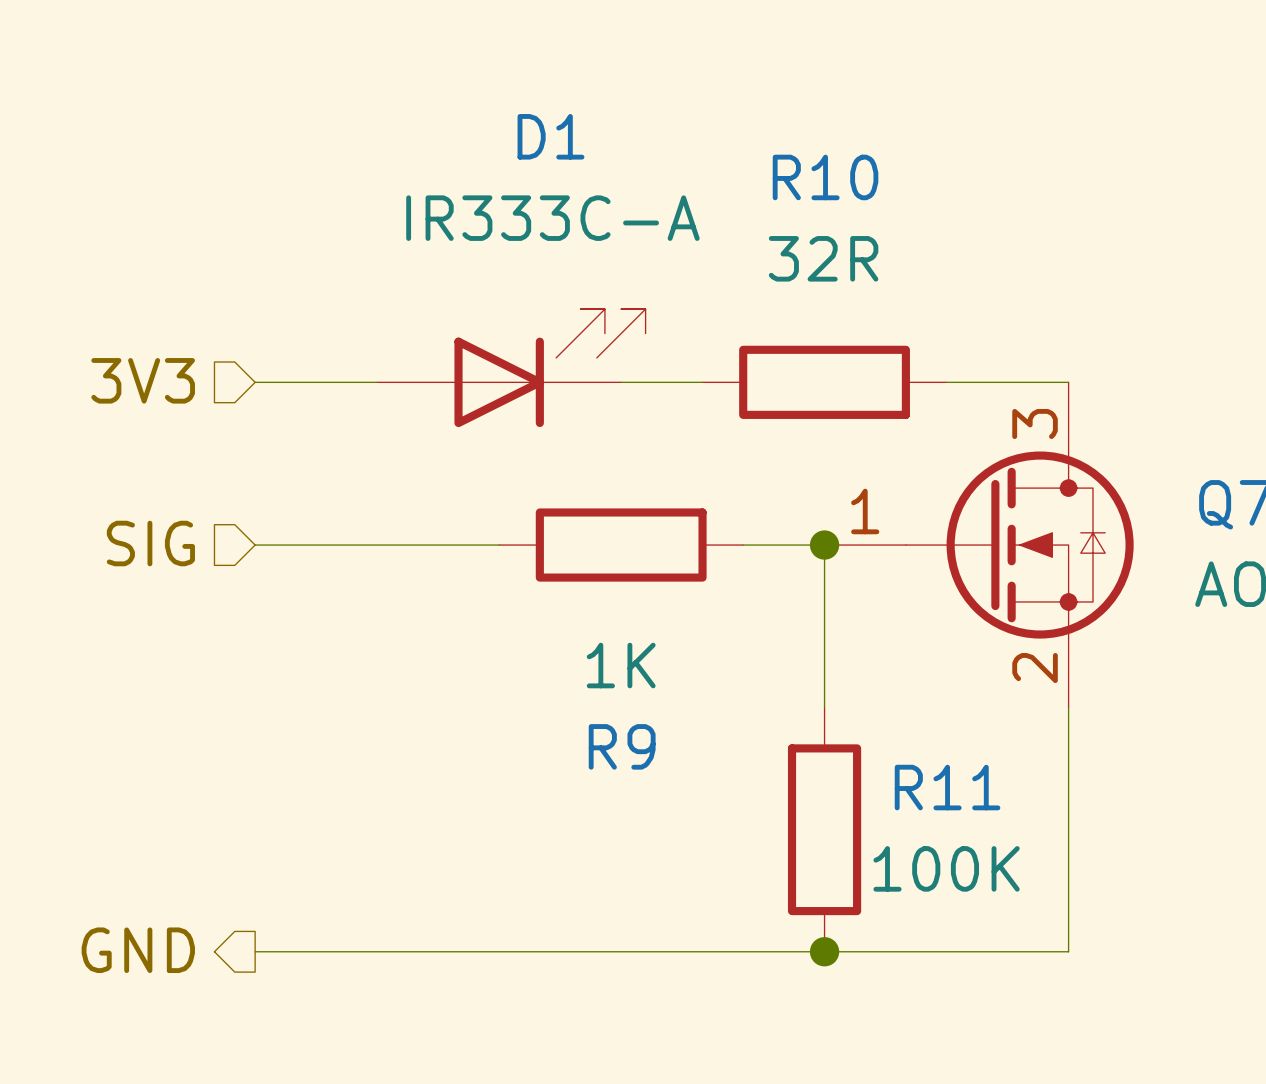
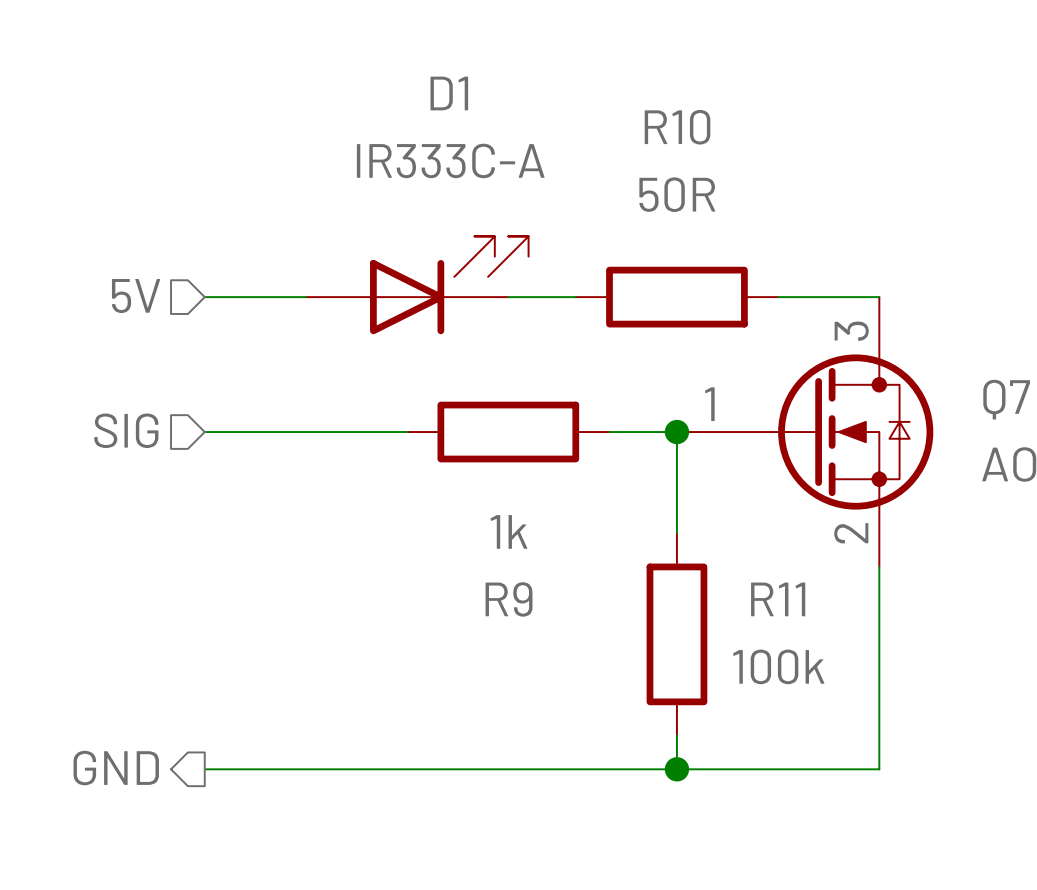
R10 value: 32R (823, 258) -> 50R (677, 194)
hierarchical label: 3V3 (143, 380) -> 5V (136, 296)
R9 value: 1K (621, 665) -> 1k (508, 531)
R11 position: (824, 829) -> (676, 634)
R11 value: 100K (946, 868) -> 100k (778, 666)

